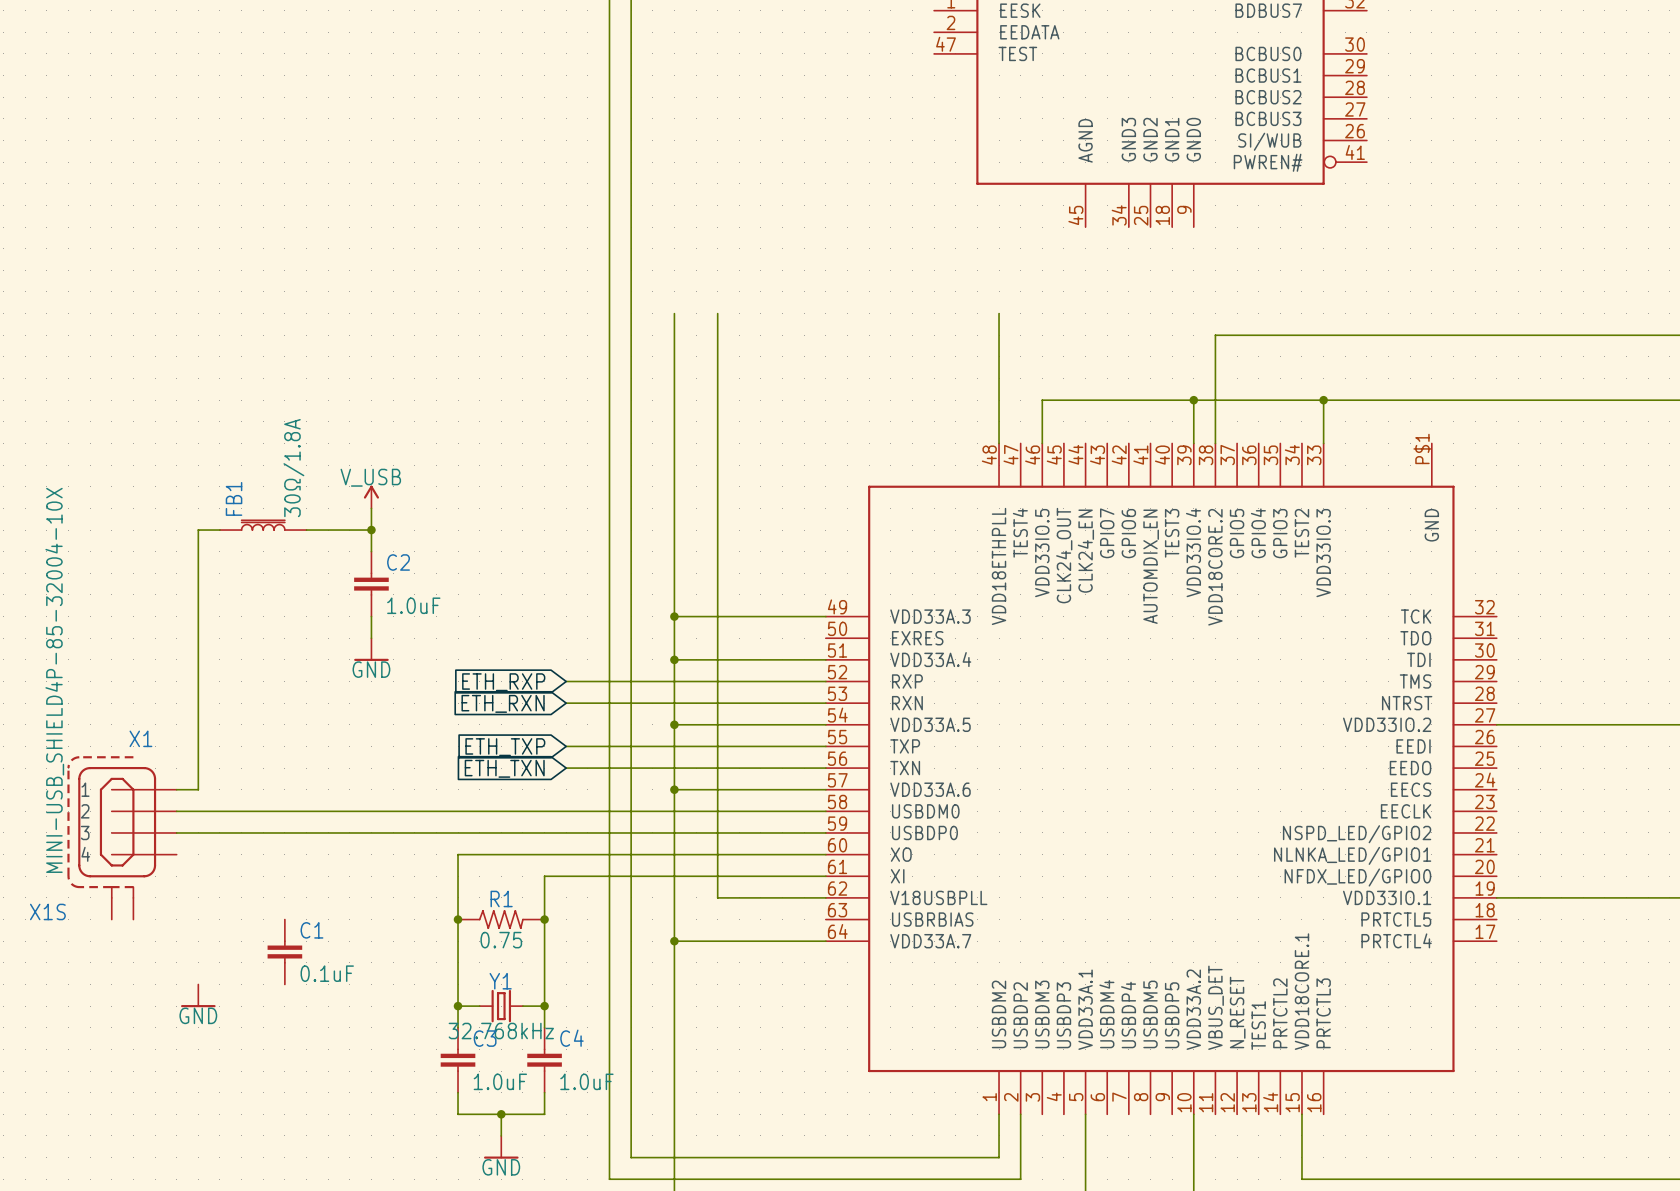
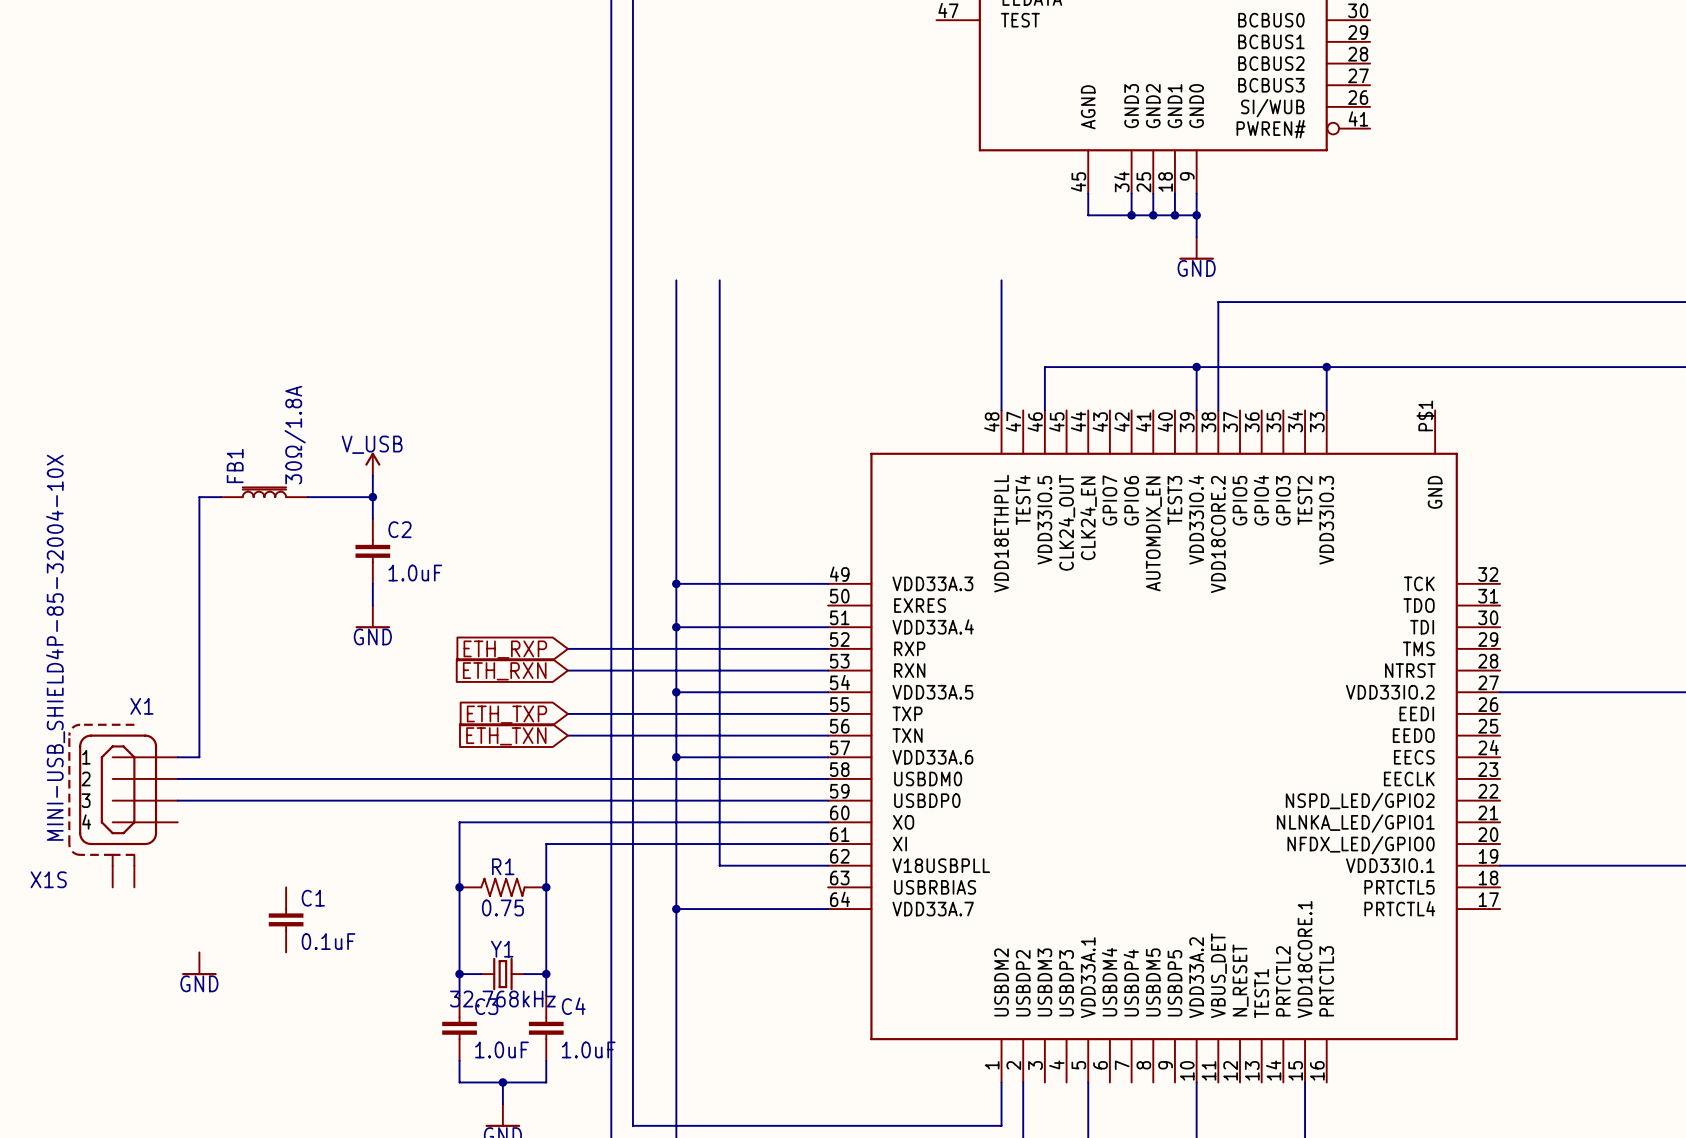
wire: none -> (1088, 193) (1088, 215) (1196, 215)
wire: none -> (1131, 193) (1131, 215)
wire: none -> (1153, 193) (1153, 215)
wire: none -> (1174, 193) (1174, 215)
wire: none -> (1196, 193) (1196, 237)
junction: none -> (1131, 215)
junction: none -> (1153, 215)
junction: none -> (1174, 215)
junction: none -> (1196, 215)
power symbol: none -> GND (1196, 248)

